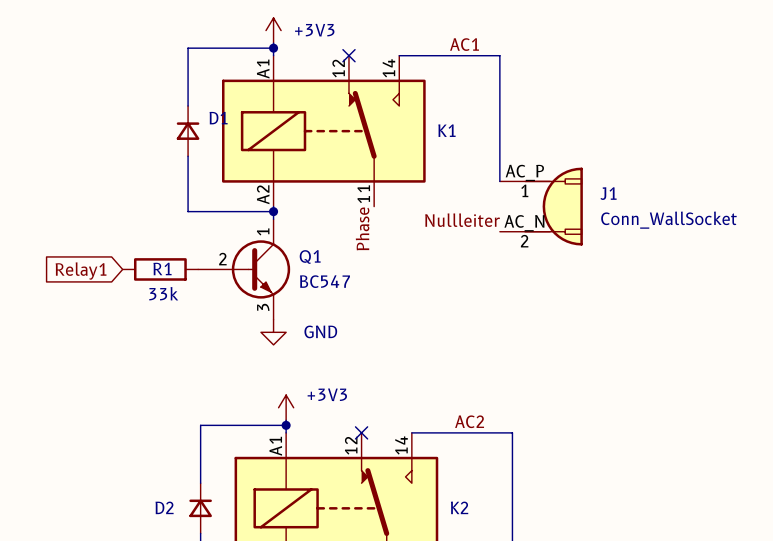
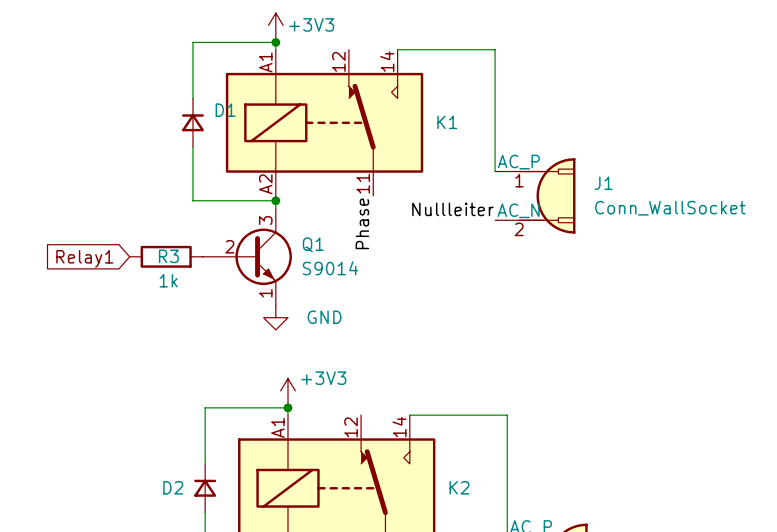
label: AC1 (464, 44) -> none
no-connect mark: (348, 55) -> none
Q1 symbol: [198, 219, 291, 320] -> [202, 208, 292, 306]
R1 name: R1 (162, 268) -> R3 (168, 256)
Q1 value: BC547 (325, 281) -> S9014 (330, 268)
R1 value: 33k (163, 293) -> 1k (168, 280)
label: AC2 (469, 421) -> none
no-connect mark: (361, 432) -> none

